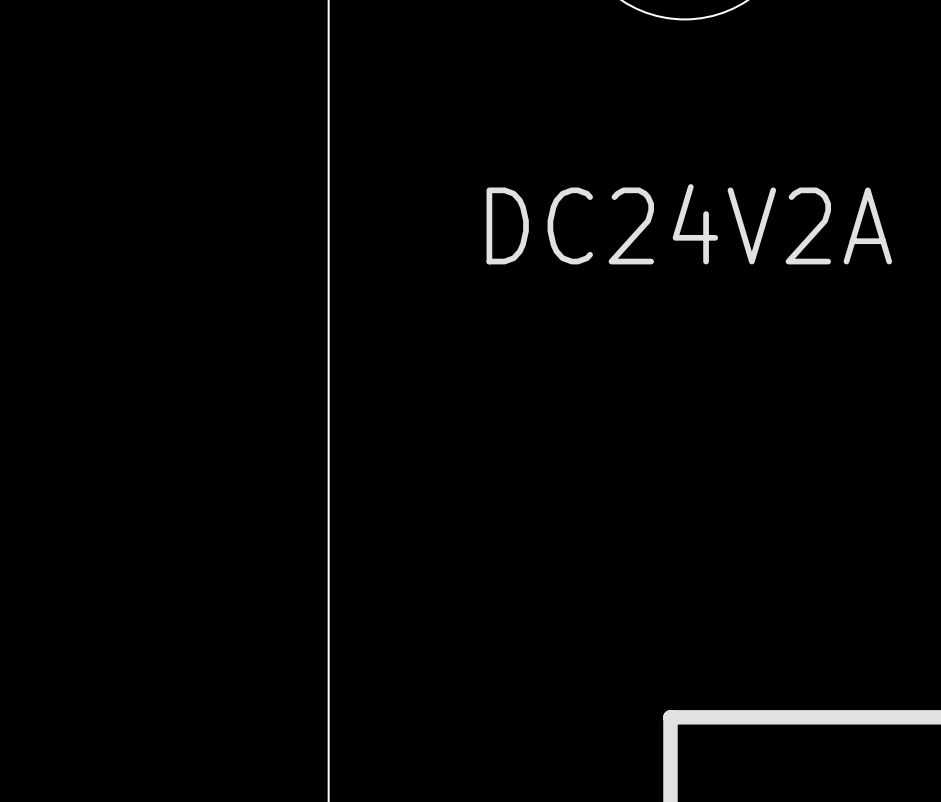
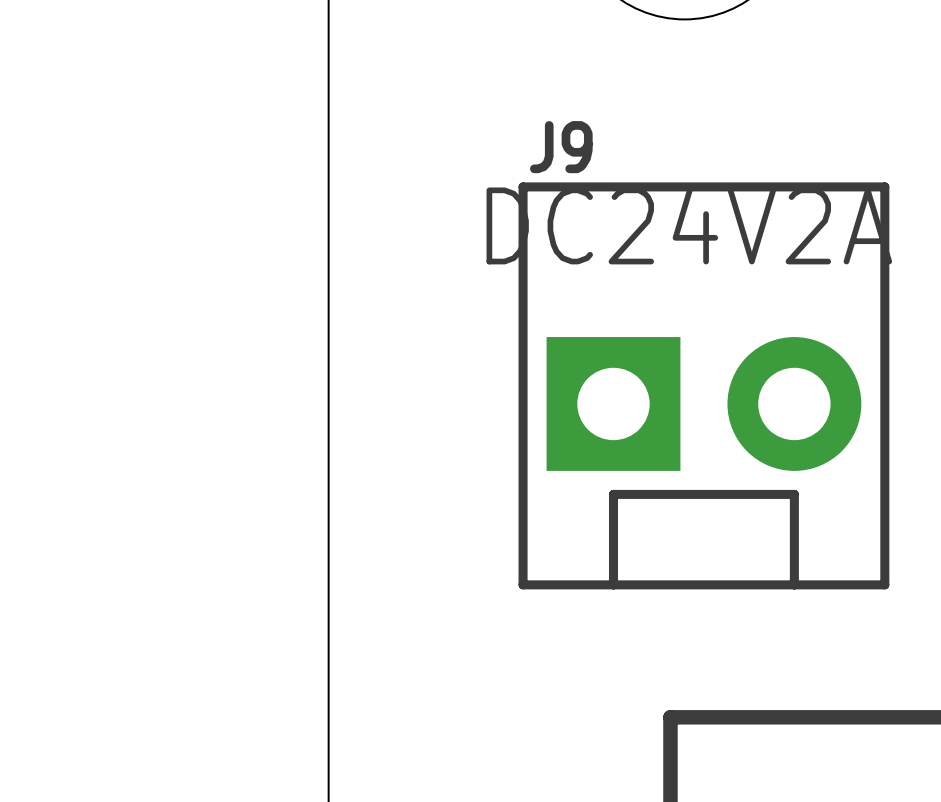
J9: none -> (703, 385)

